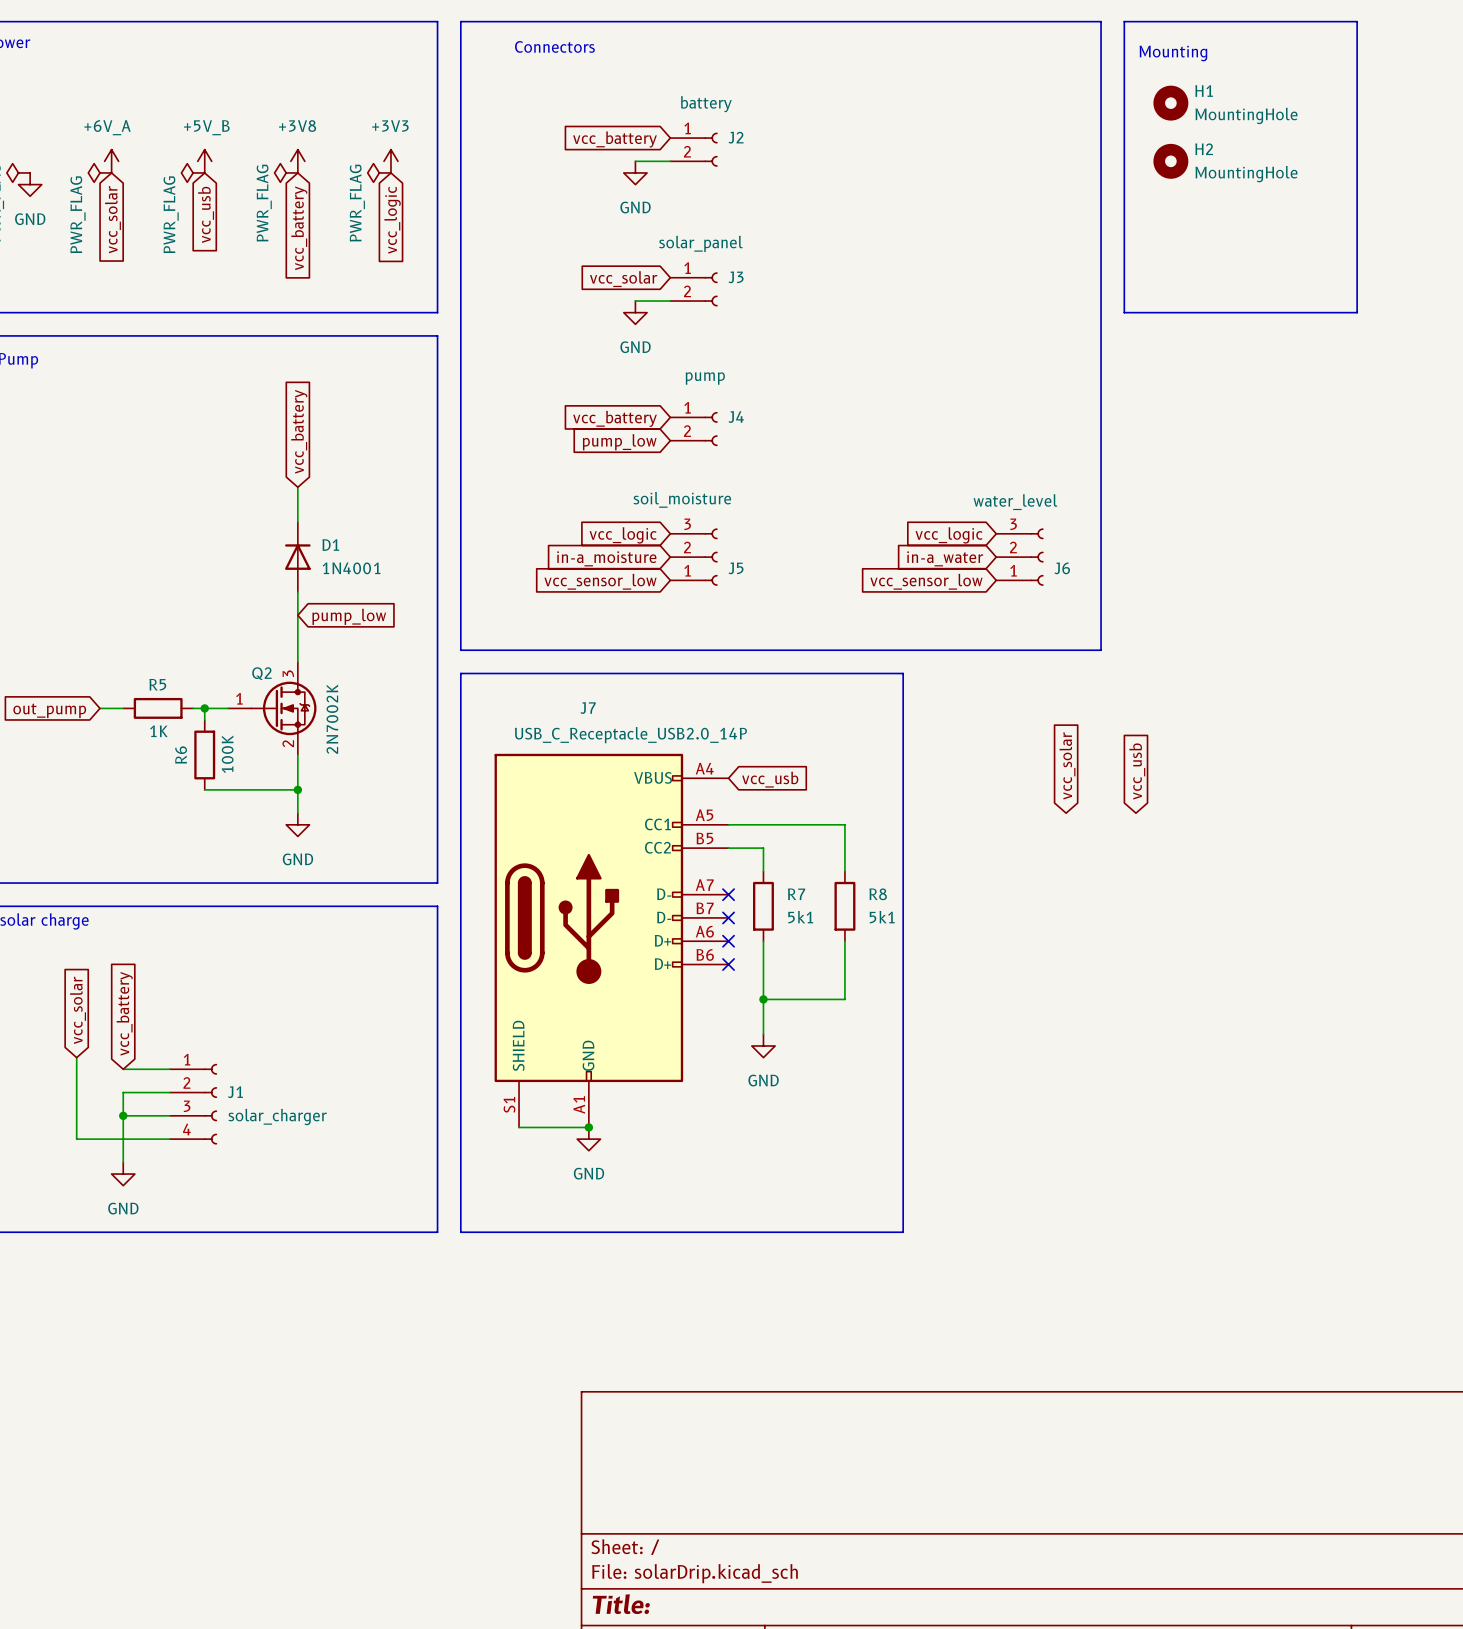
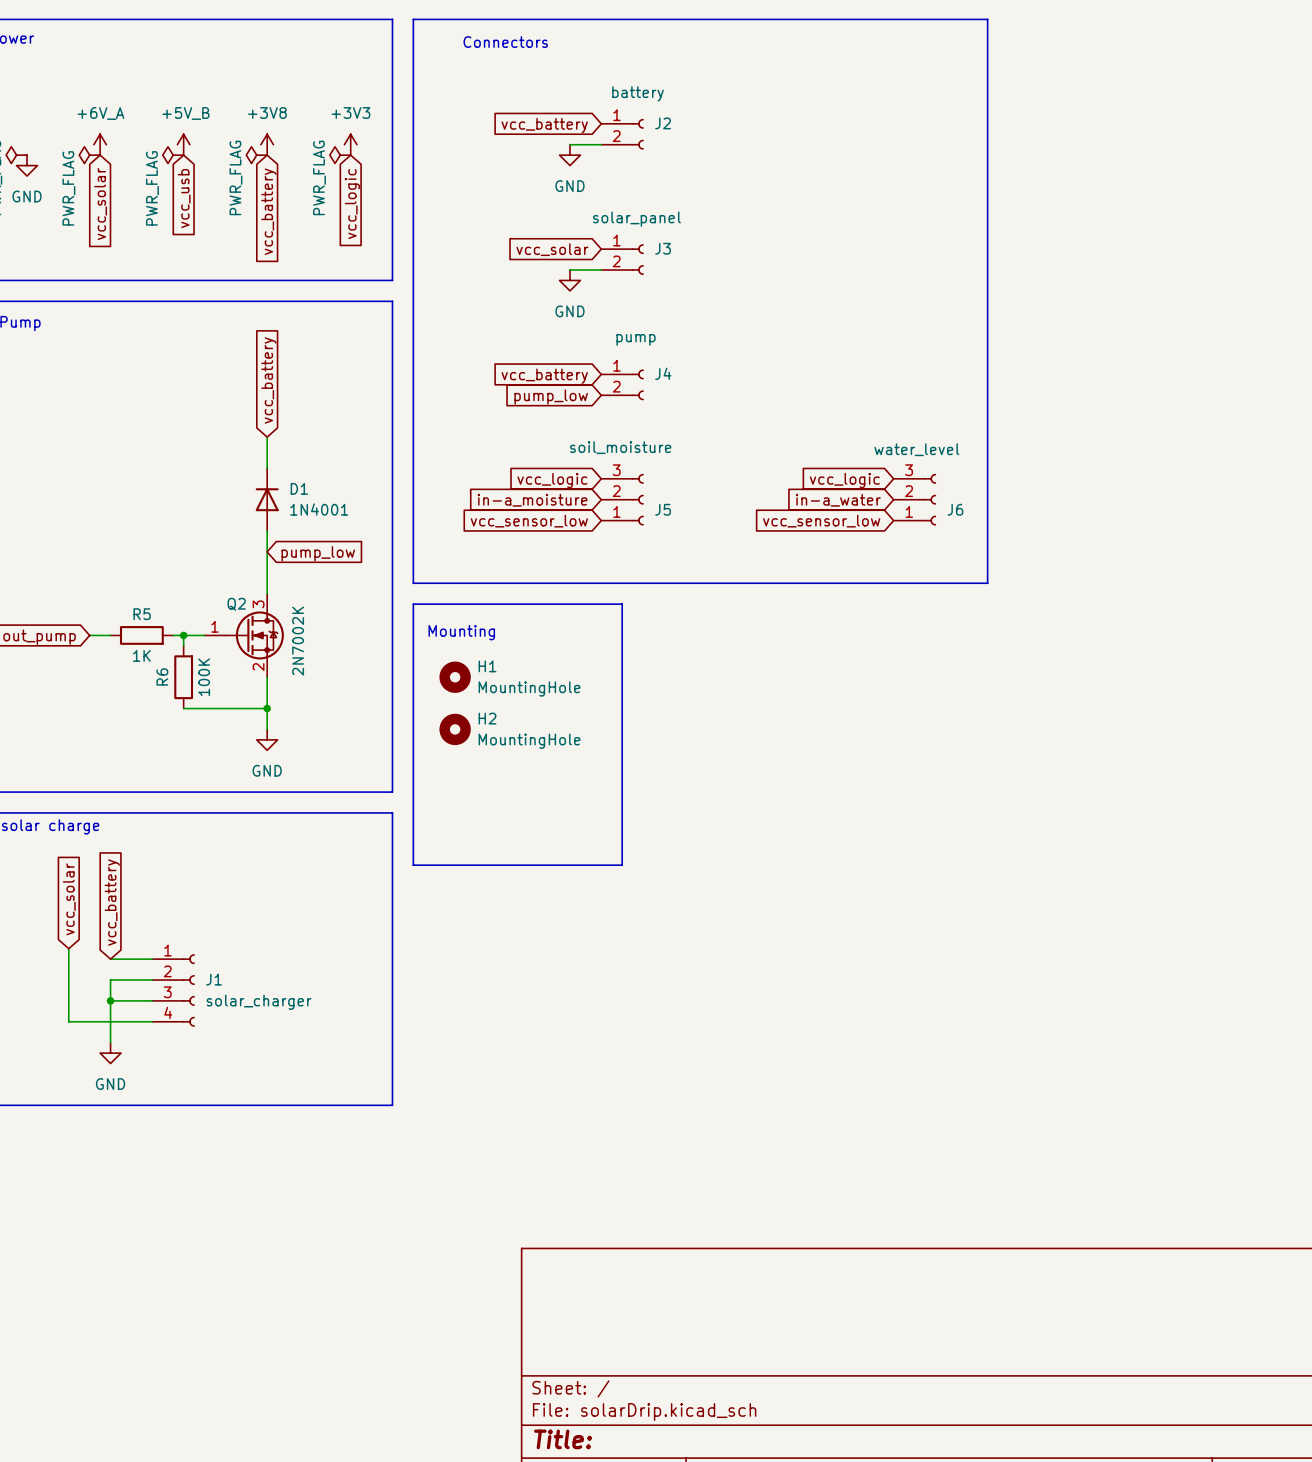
line: (1124, 21) (1357, 21) (1357, 312) (1124, 312) (1124, 21) -> none
text: Mounting (1173, 53) -> none
H1 position: (1170, 103) -> (455, 677)
H2 position: (1170, 161) -> (455, 729)
line: (693, 673) (903, 673) (903, 1232) (460, 1232) (460, 964) -> (622, 604) (622, 865) (413, 865)
text: none -> Mounting (461, 632)
global label: vcc_solar (1067, 765) -> none
global label: vcc_usb (1137, 771) -> none
global label: vcc_usb (770, 779) -> none
wire: (728, 824) (844, 824) (844, 871) -> none
wire: (728, 848) (763, 848) (763, 871) -> none
no-connect mark: (728, 894) -> none
R7: 5k1 (763, 906) -> none
R8: 5k1 (844, 906) -> none
no-connect mark: (728, 917) -> none
J7: USB_C_Receptacle_USB2.0_14P (611, 940) -> none
no-connect mark: (728, 941) -> none
wire: (763, 941) (763, 1034) -> none
wire: (844, 941) (844, 999) (763, 999) -> none
no-connect mark: (728, 964) -> none
junction: (763, 999) -> none
power symbol: GND (763, 1045) -> none
wire: (519, 1127) (588, 1127) -> none
junction: (588, 1127) -> none
power symbol: GND (588, 1139) -> none

